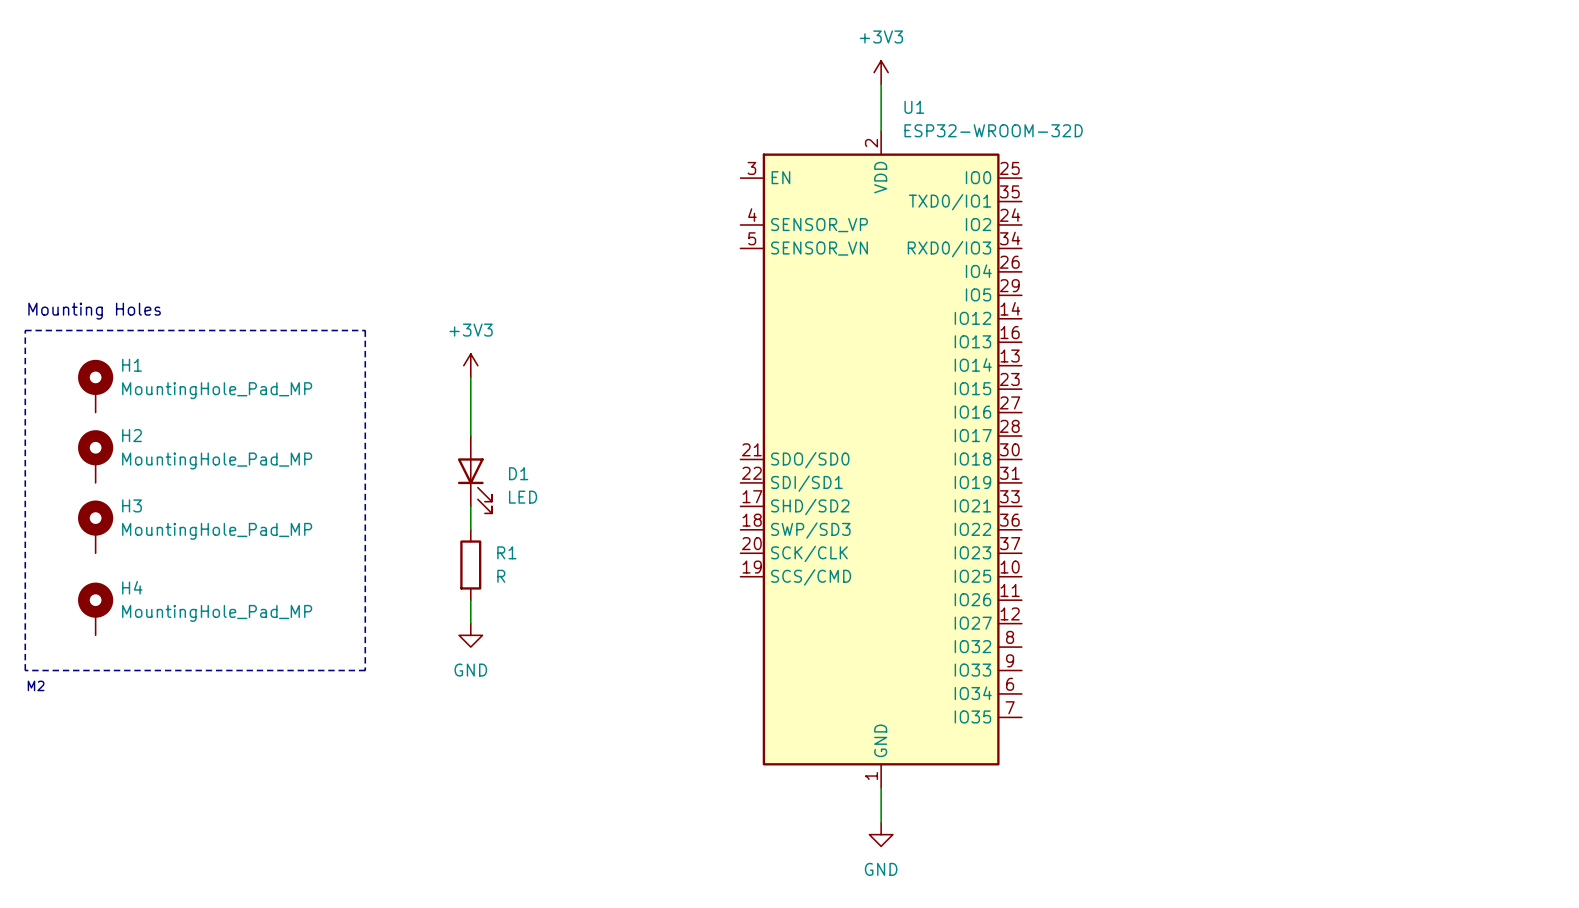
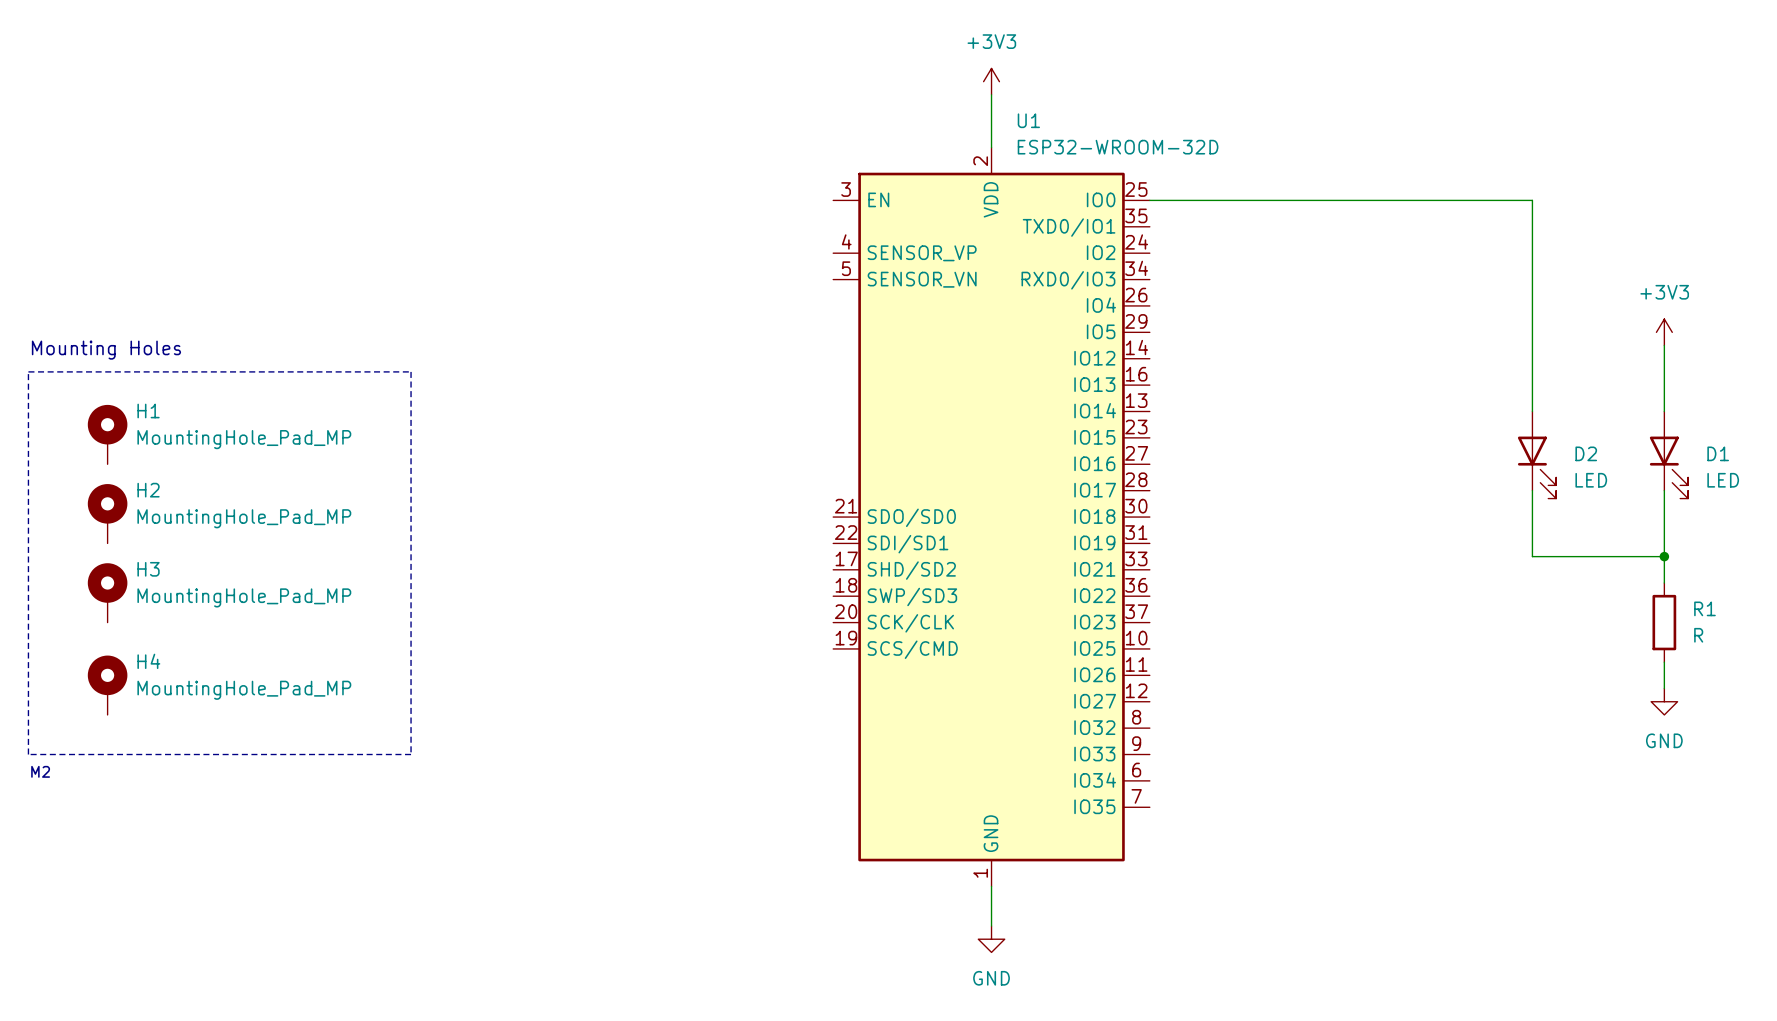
wire: none -> (1149, 200) (1532, 200) (1532, 411)
power symbol: none -> +3V3 (1664, 332)
wire: none -> (1664, 345) (1664, 411)
power symbol: +3V3 (470, 365) -> none
wire: (470, 377) (470, 436) -> none
D2: none -> LED (1537, 455)
wire: none -> (1532, 490) (1532, 556) (1664, 556)
wire: none -> (1664, 490) (1664, 583)
D1 position: (474, 474) -> (1668, 455)
junction: none -> (1664, 556)
wire: (470, 506) (470, 529) -> none
R1 position: (470, 564) -> (1664, 622)
wire: none -> (1664, 662) (1664, 688)
wire: (470, 600) (470, 623) -> none
power symbol: none -> GND (1664, 701)
power symbol: GND (470, 635) -> none

